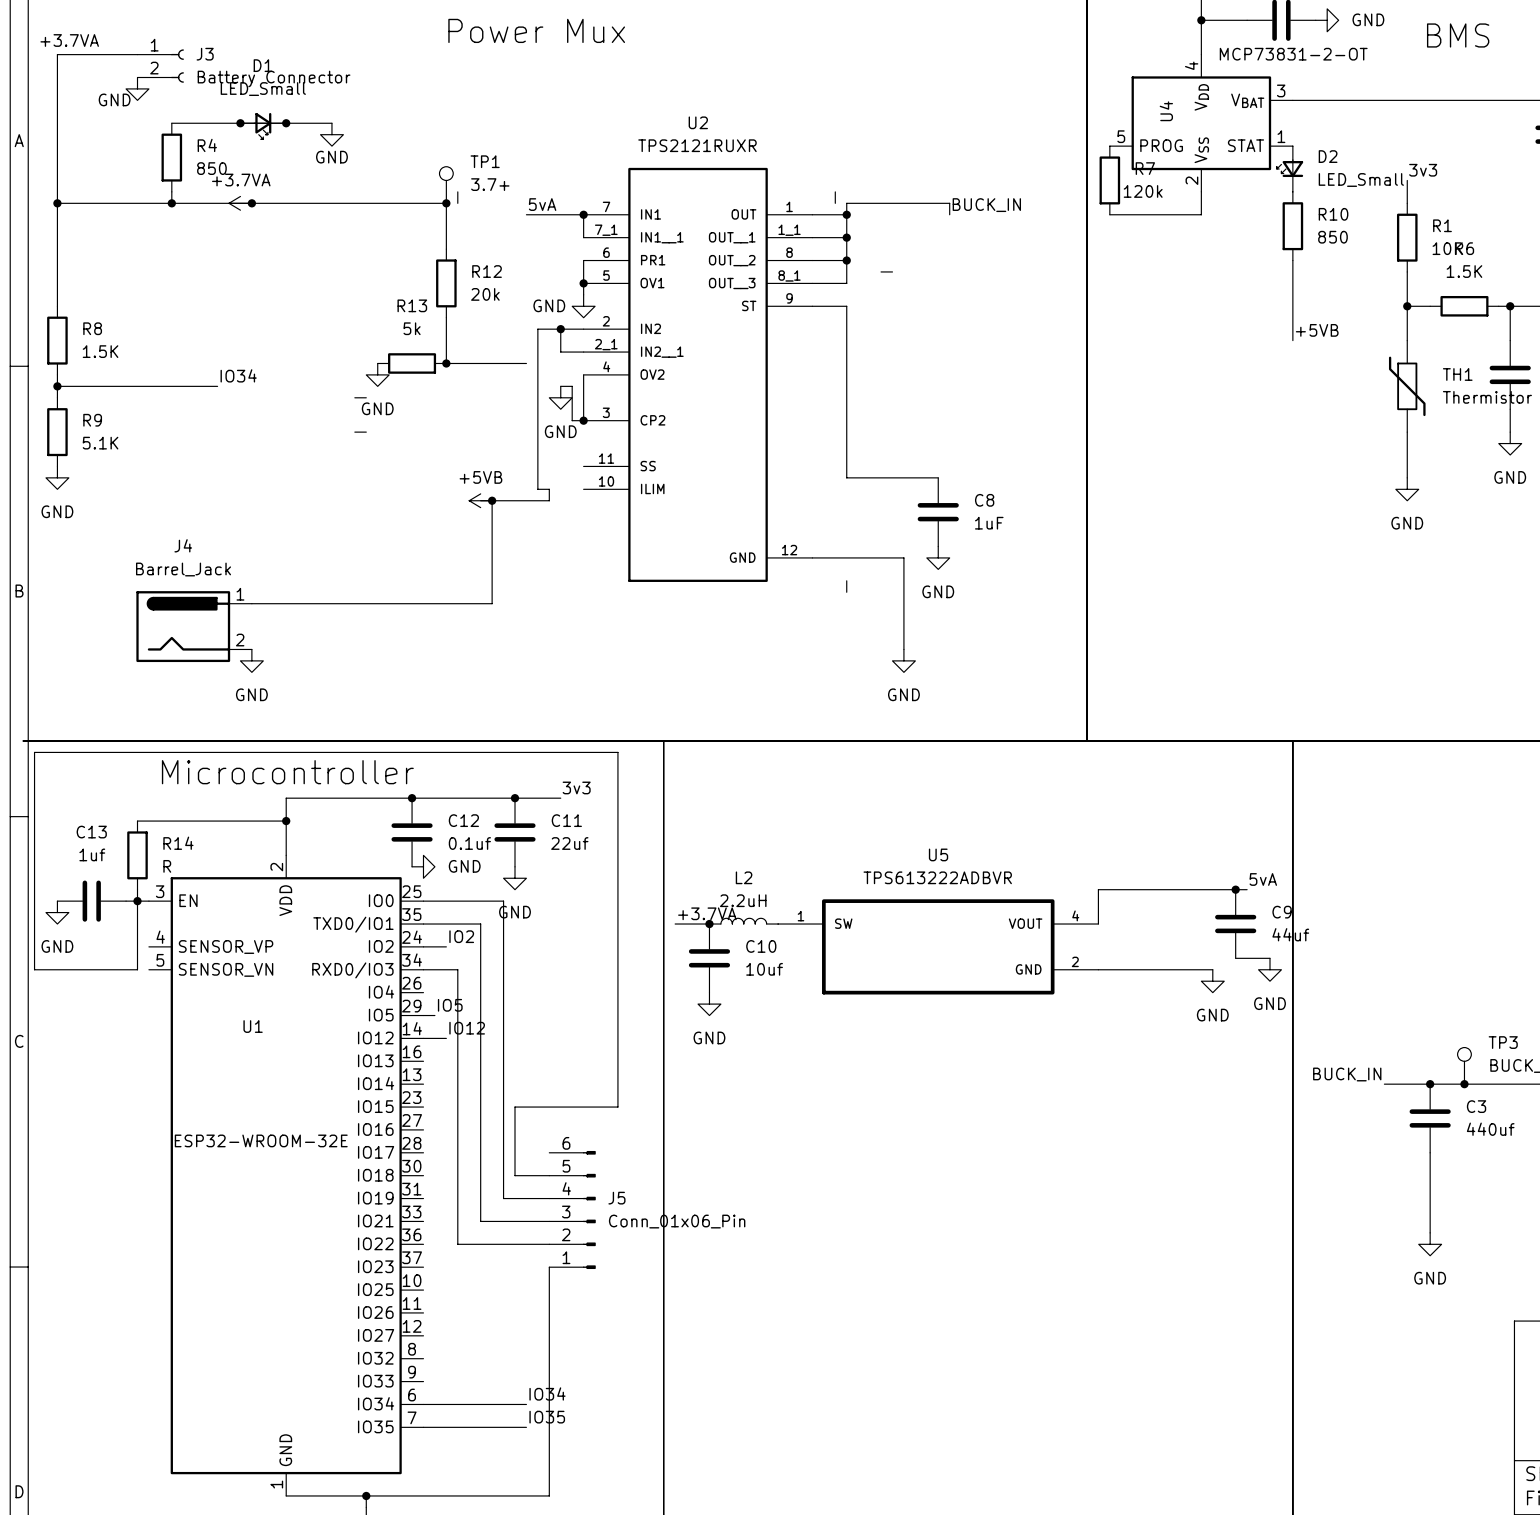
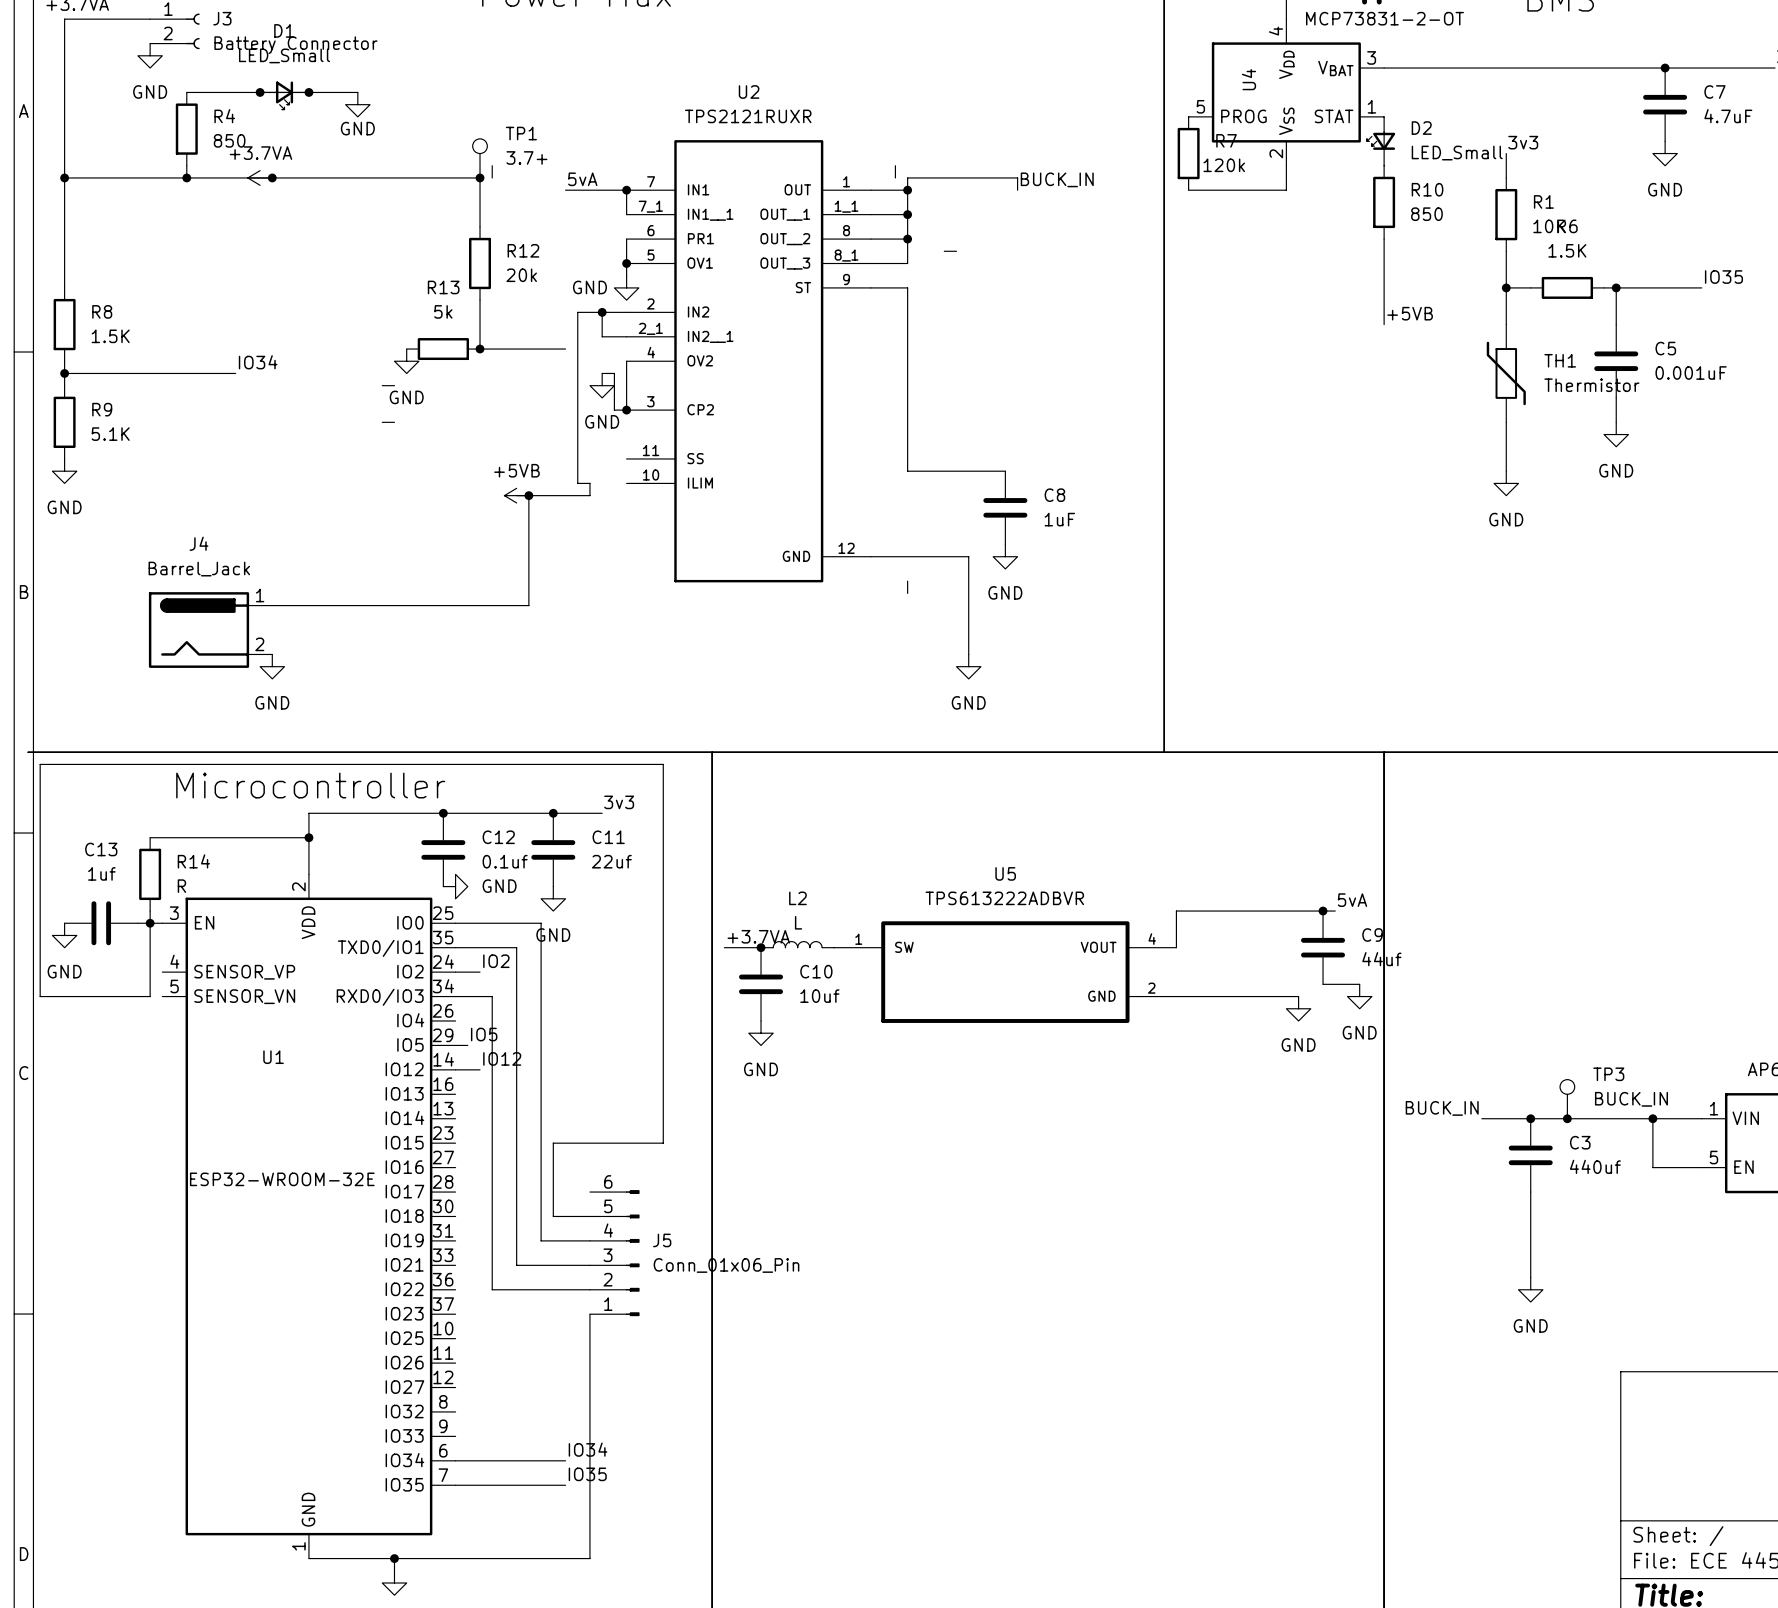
power symbol text position: GND (114, 99) -> GND (150, 91)
L2 value: 2.2uH (743, 900) -> L (798, 922)

